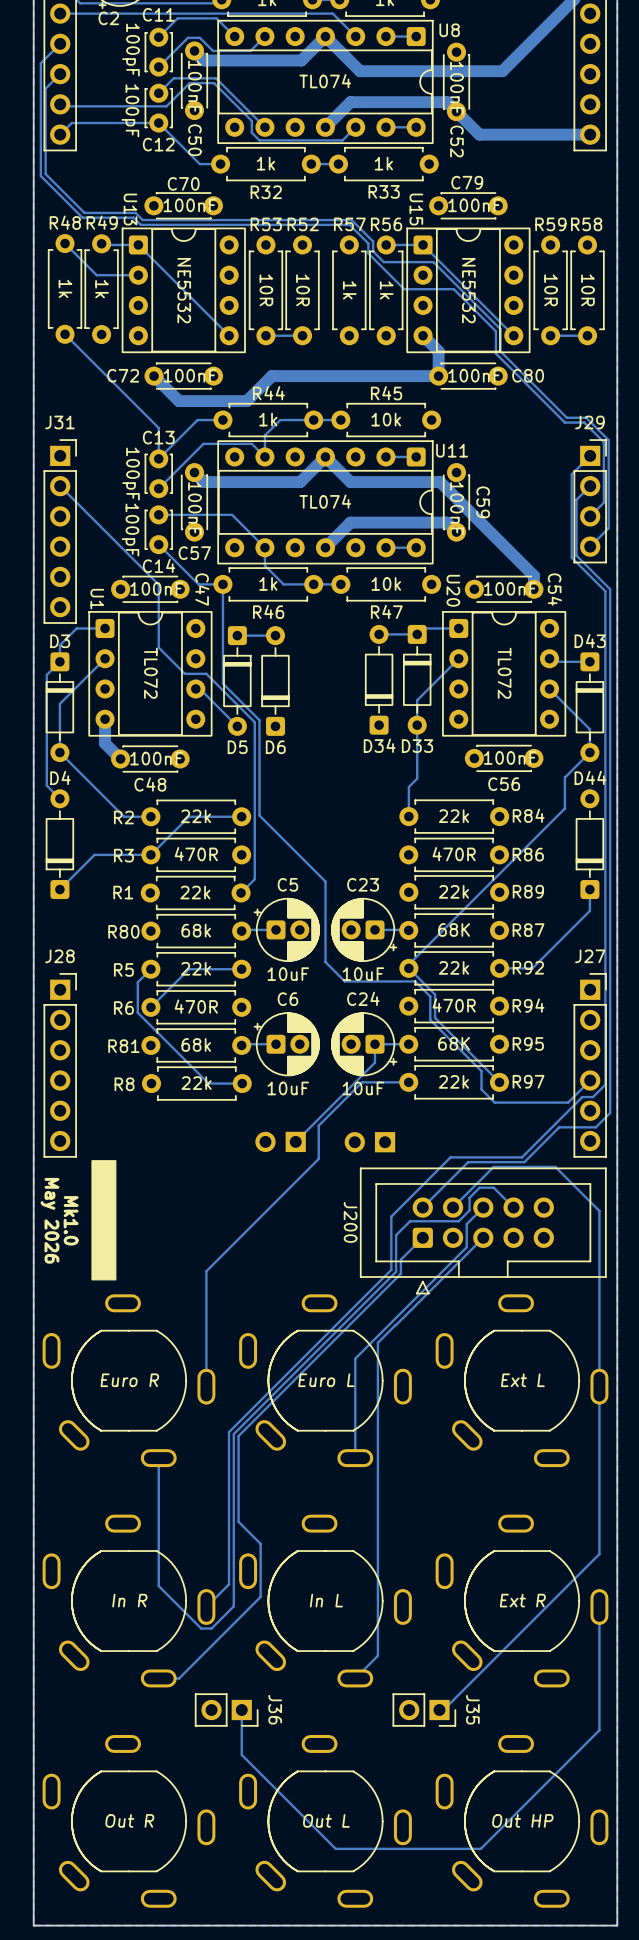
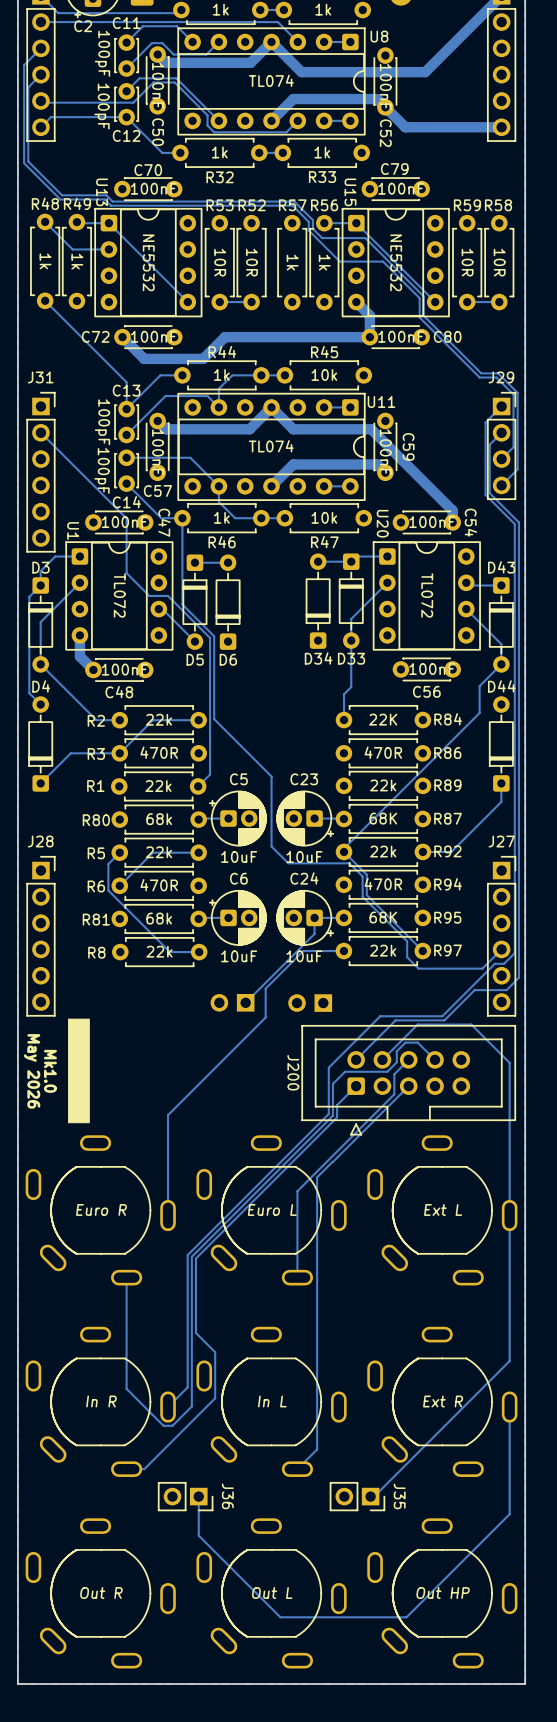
R84 value: 22k (453, 816) -> 22K (383, 719)

